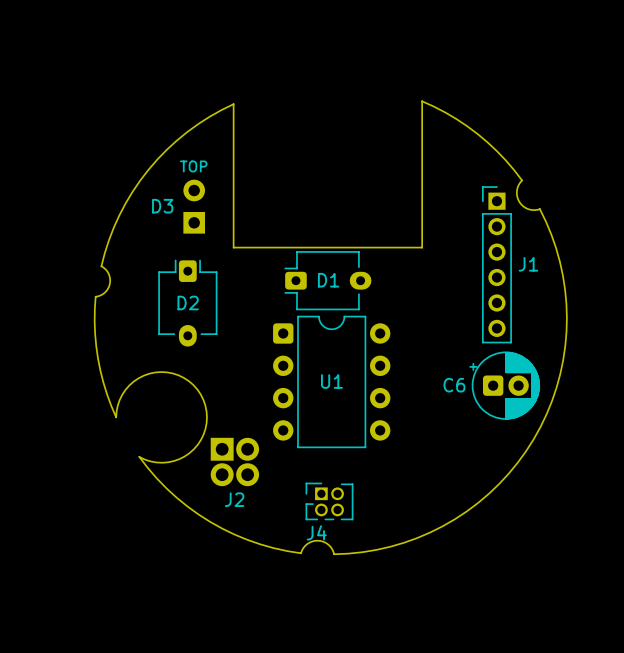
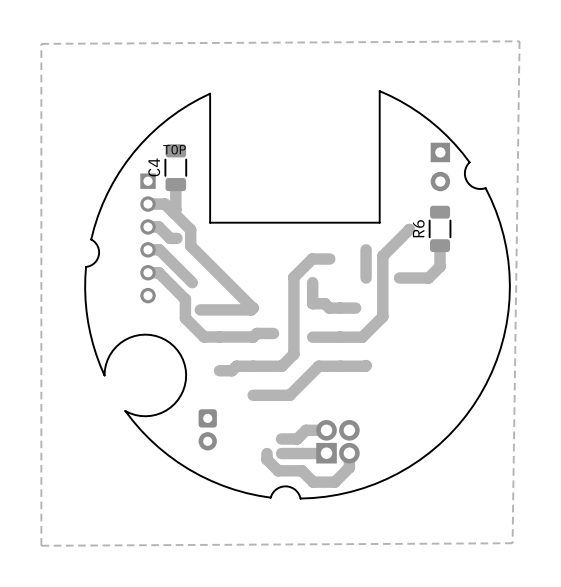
zone outline: none -> (519, 41) (41, 43) (41, 545) (512, 543) (519, 41)
part: none -> (440, 167)
C4: none -> (175, 167)
track: none -> (175, 184) (175, 209) (173, 212)
D3: (194, 206) -> none
track: none -> (148, 204) (164, 204) (190, 229) (190, 245) (253, 308) (251, 309) (200, 309)
track: none -> (148, 226) (158, 226) (170, 238) (176, 238)
R6: none -> (440, 228)
track: none -> (409, 229) (382, 256) (382, 316) (362, 337) (312, 337)
J1: (496, 264) -> none
part: none -> (148, 238)
track: none -> (440, 245) (440, 266) (428, 278) (399, 278)
track: none -> (148, 249) (159, 249) (192, 282)
track: none -> (366, 249) (366, 278)
D1: (327, 280) -> none
track: none -> (329, 259) (312, 259) (293, 277) (293, 354) (281, 366) (236, 366) (232, 370) (219, 370)
track: none -> (148, 272) (158, 272) (185, 299) (185, 318) (204, 336) (253, 337) (256, 333) (273, 333)
D2: (187, 303) -> none
track: none -> (312, 282) (312, 303) (325, 303) (329, 308) (355, 308)
U1: (331, 381) -> none
C6: (504, 385) -> none
track: none -> (366, 365) (318, 366) (289, 395) (253, 395)
J2: (234, 461) -> none
part: none -> (207, 429)
track: none -> (326, 430) (305, 430) (297, 439) (281, 439)
part: none -> (337, 441)
J4: (329, 501) -> none
track: none -> (326, 453) (281, 453)
track: none -> (349, 453) (349, 467) (334, 482) (313, 482) (301, 470) (278, 470) (267, 459) (267, 453)

